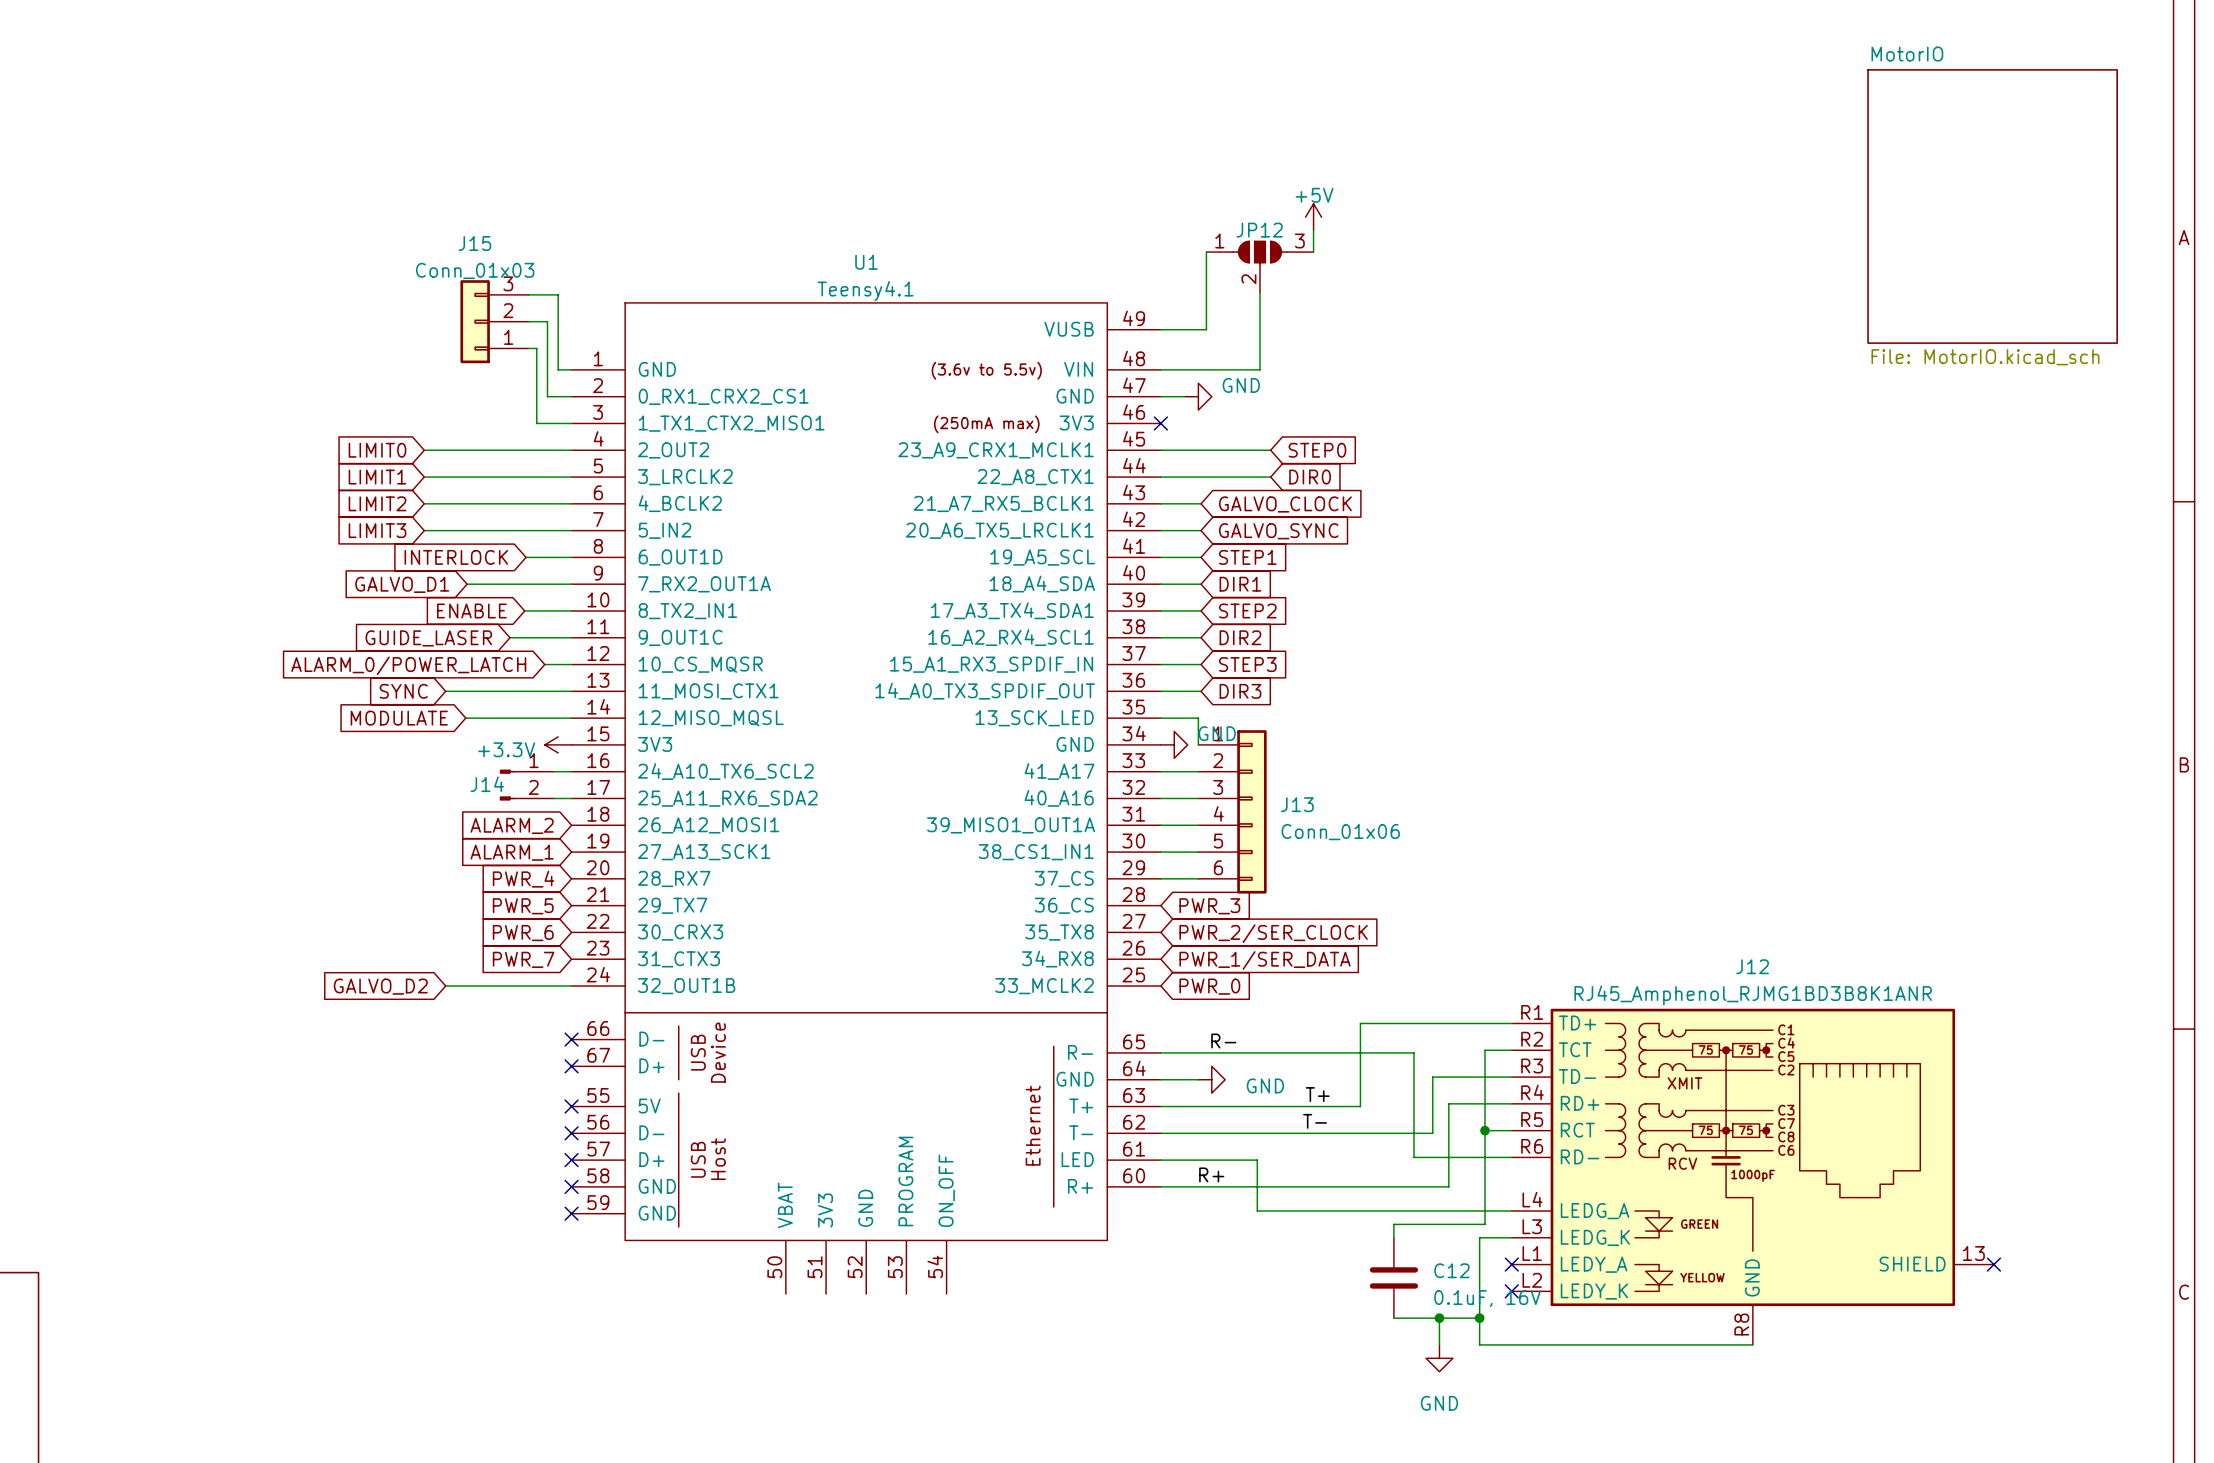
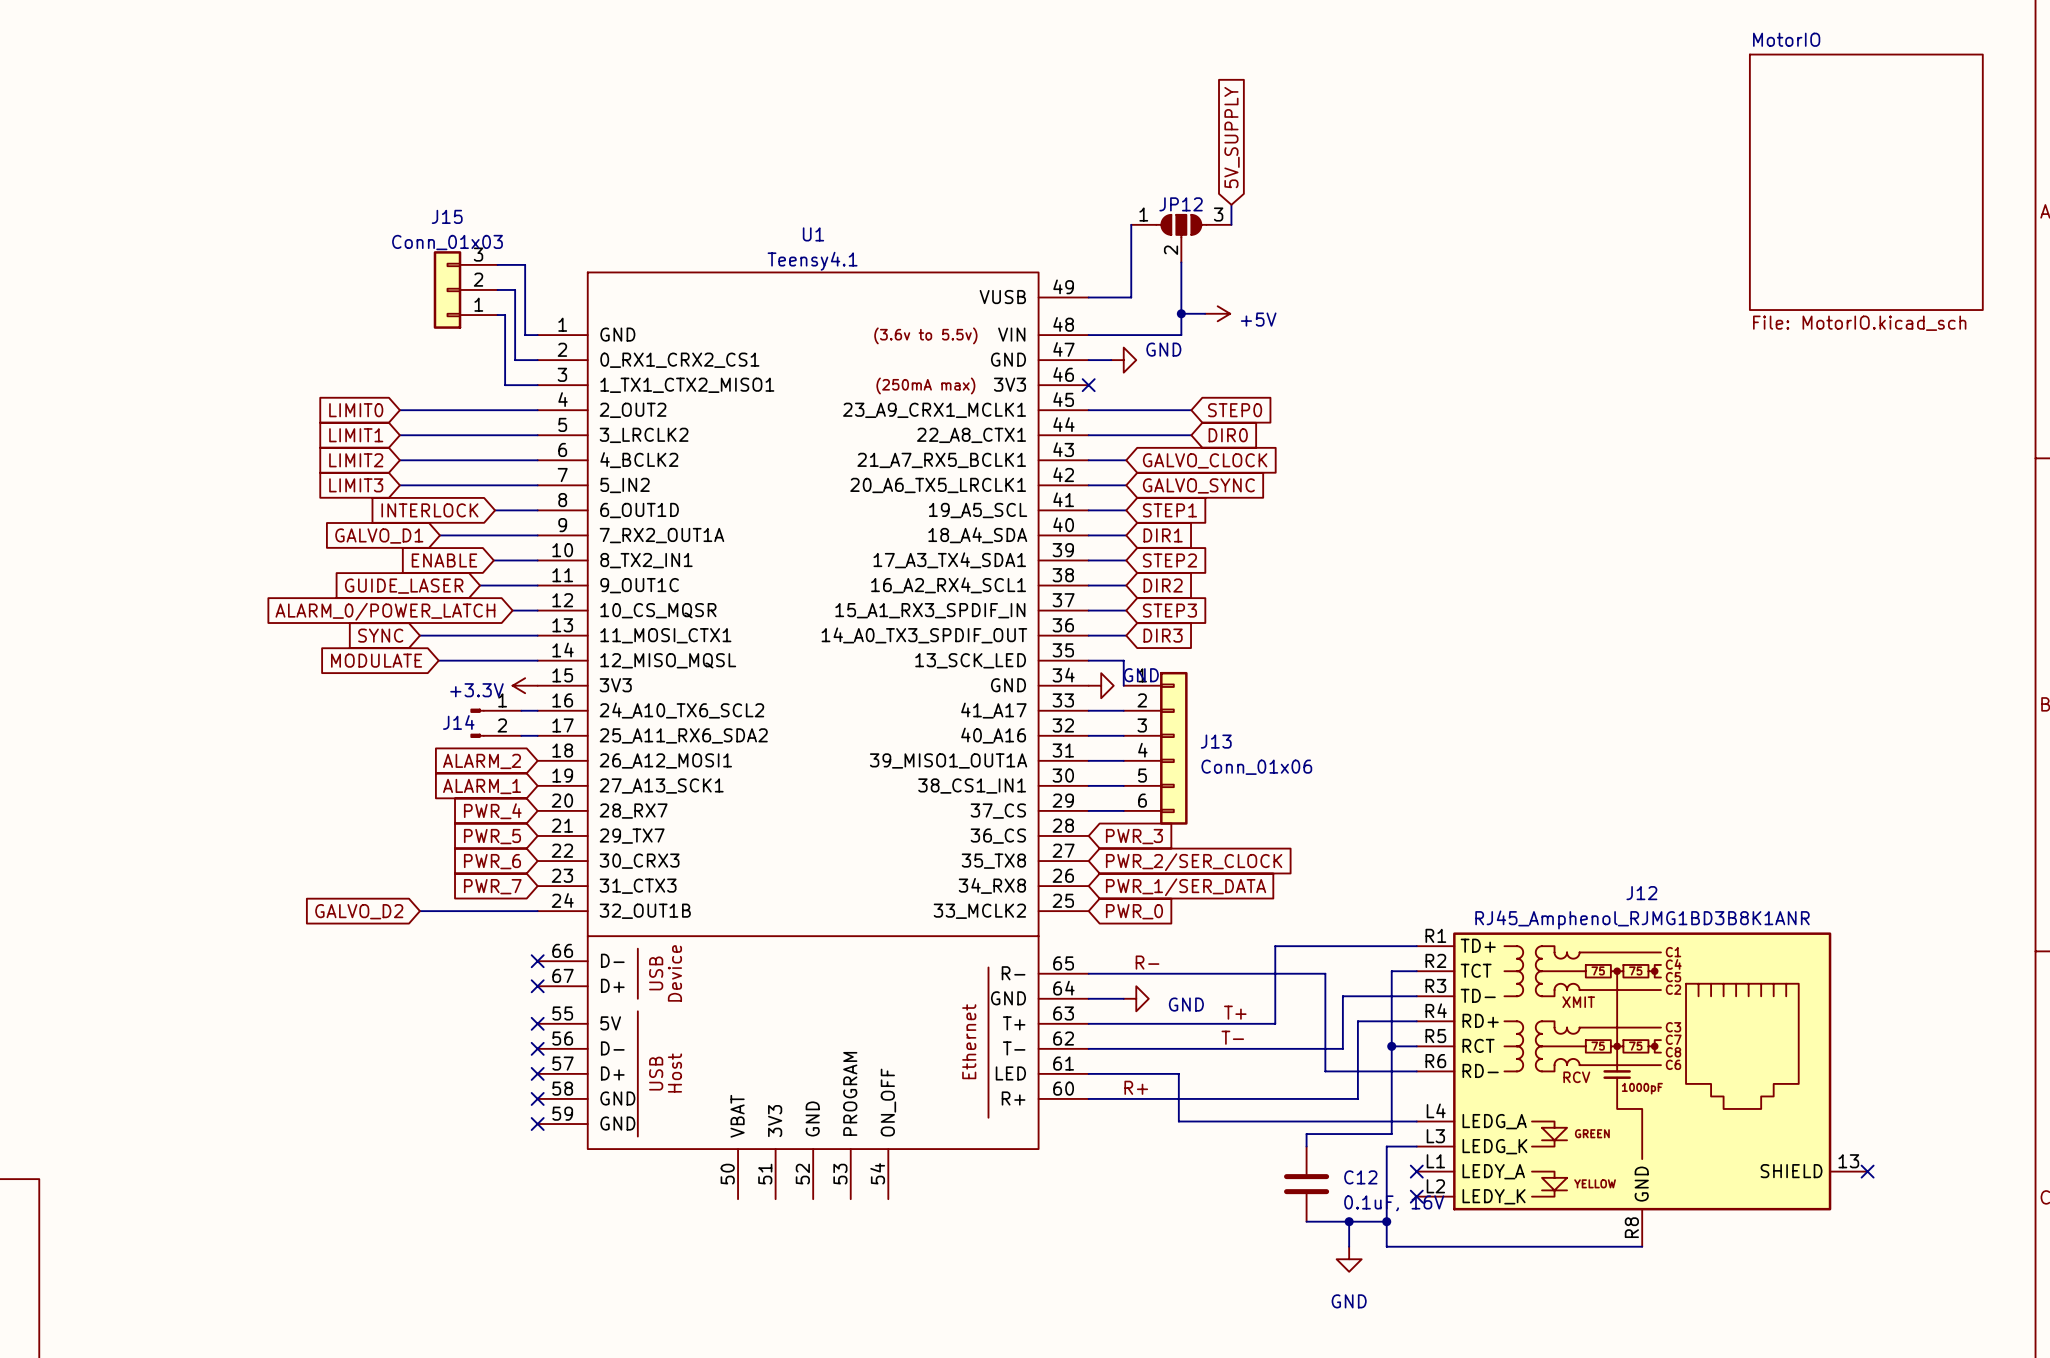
global label: none -> 5V_SUPPLY (1232, 137)
power symbol text position: +5V (1314, 195) -> +5V (1258, 319)
power symbol rotation: 0° (1313, 217) -> 90° clockwise (1217, 313)
power symbol position: +5V (1313, 217) -> +5V (1217, 313)
wire: none -> (1181, 313) (1205, 313)
junction: none -> (1181, 313)

